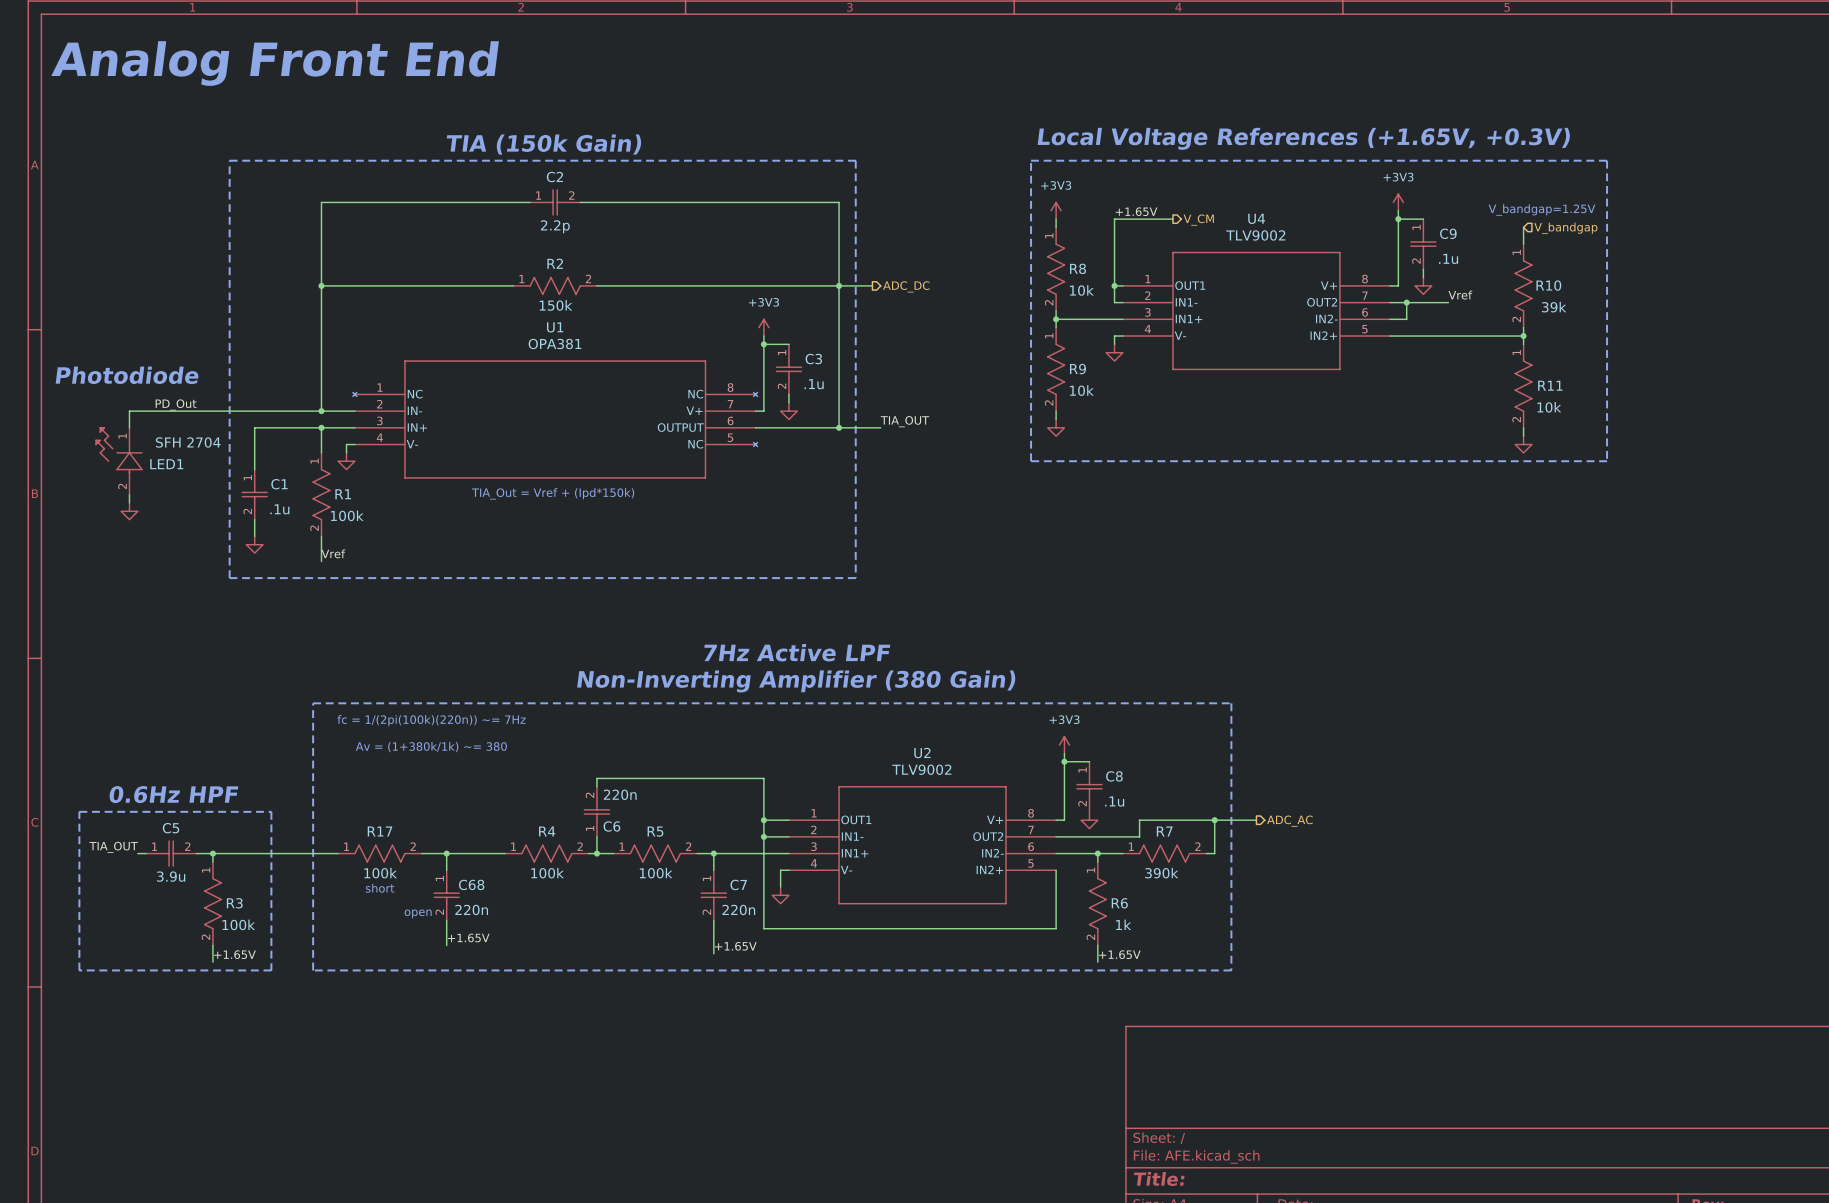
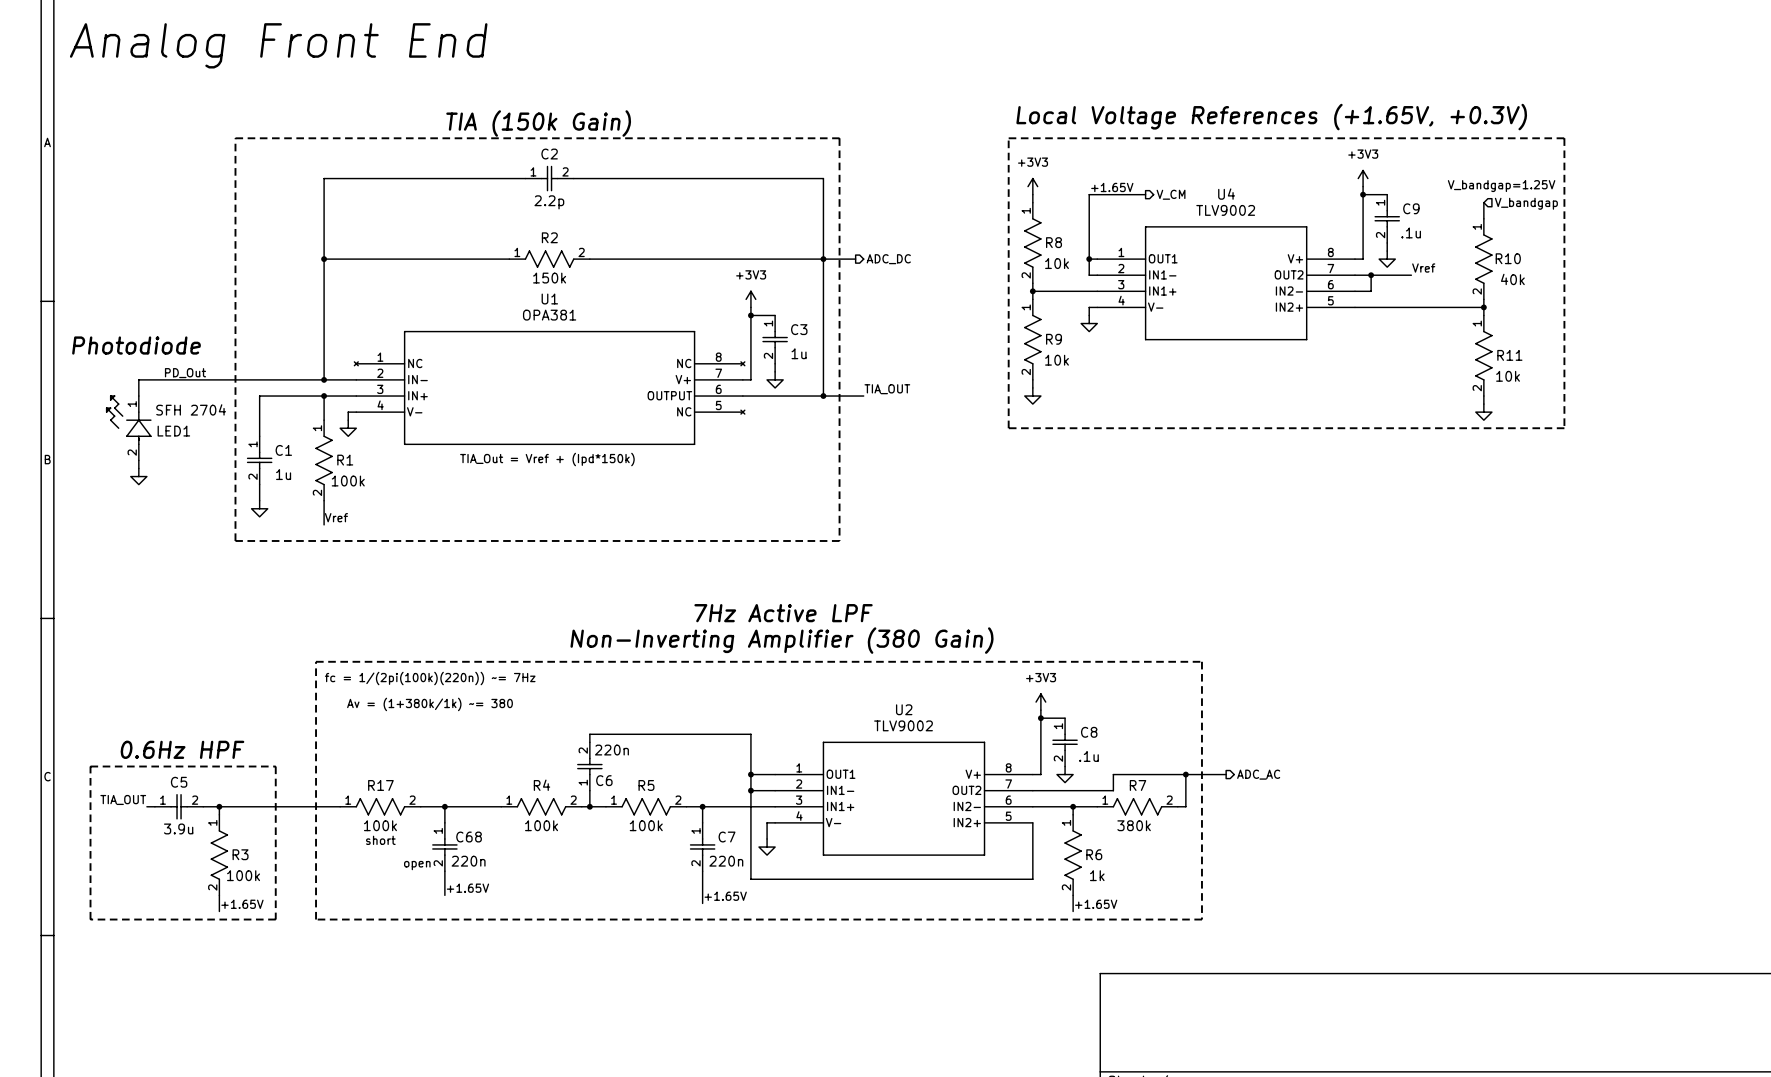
R10 value: 39k (1554, 307) -> 40k (1512, 279)
C3 value: .1u (814, 384) -> 1u (799, 353)
C1 value: .1u (279, 509) -> 1u (283, 474)
R7 value: 390k (1161, 873) -> 380k (1134, 825)

